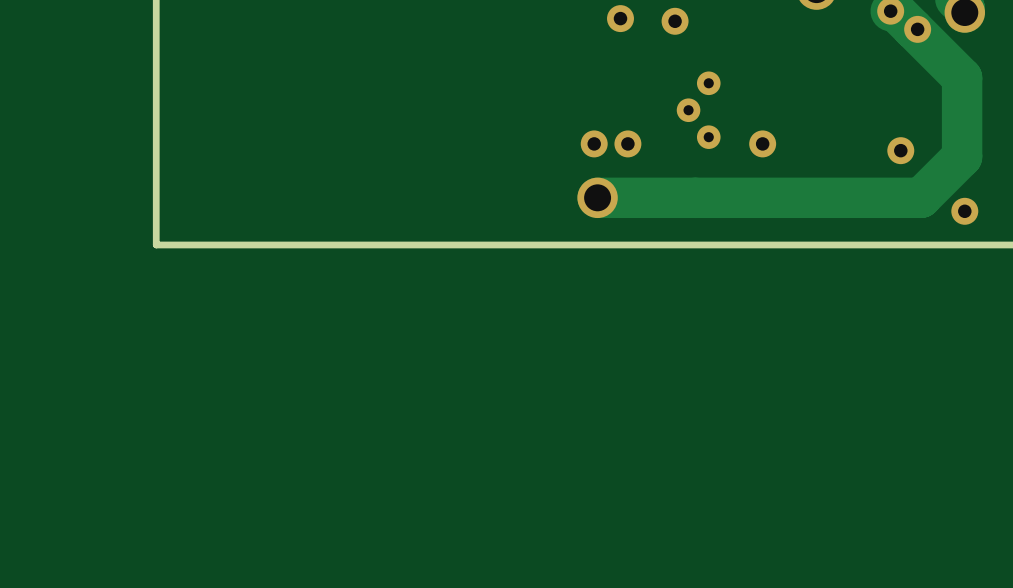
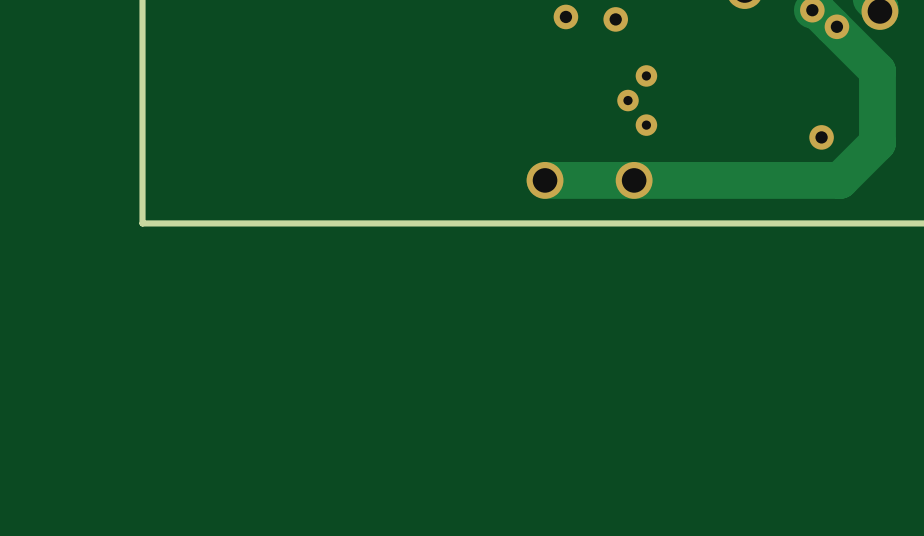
via: (594, 143) -> none
via: (627, 143) -> none
via: (762, 143) -> none
via: none -> (634, 180)
via: (964, 211) -> none

